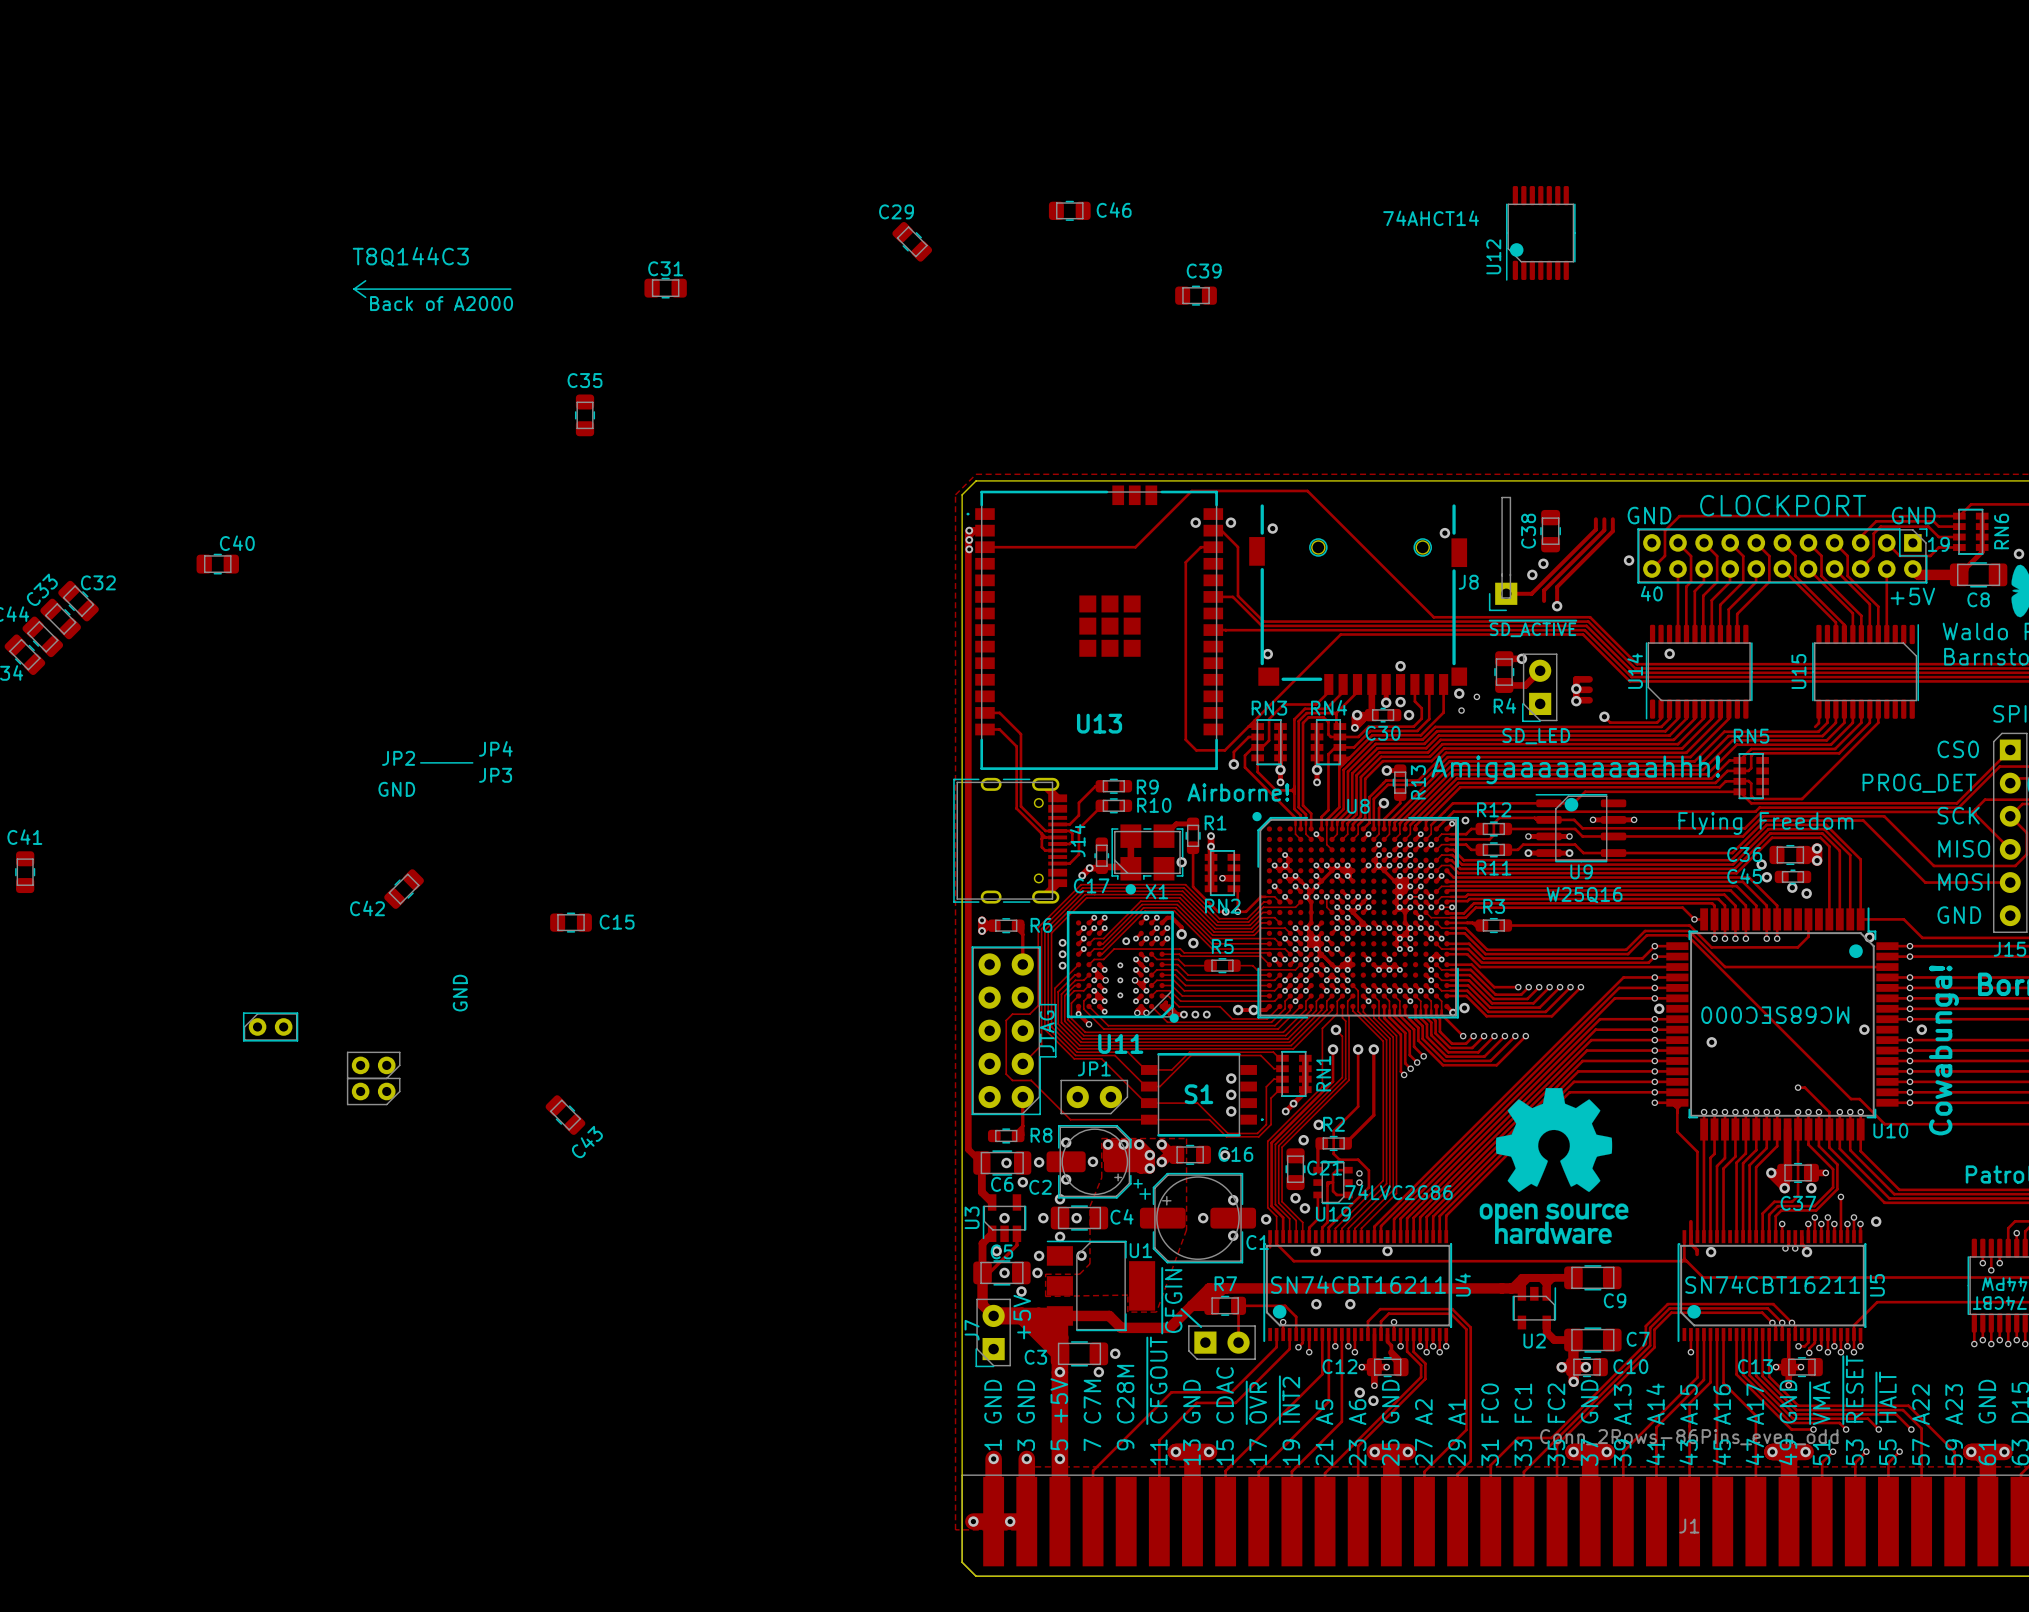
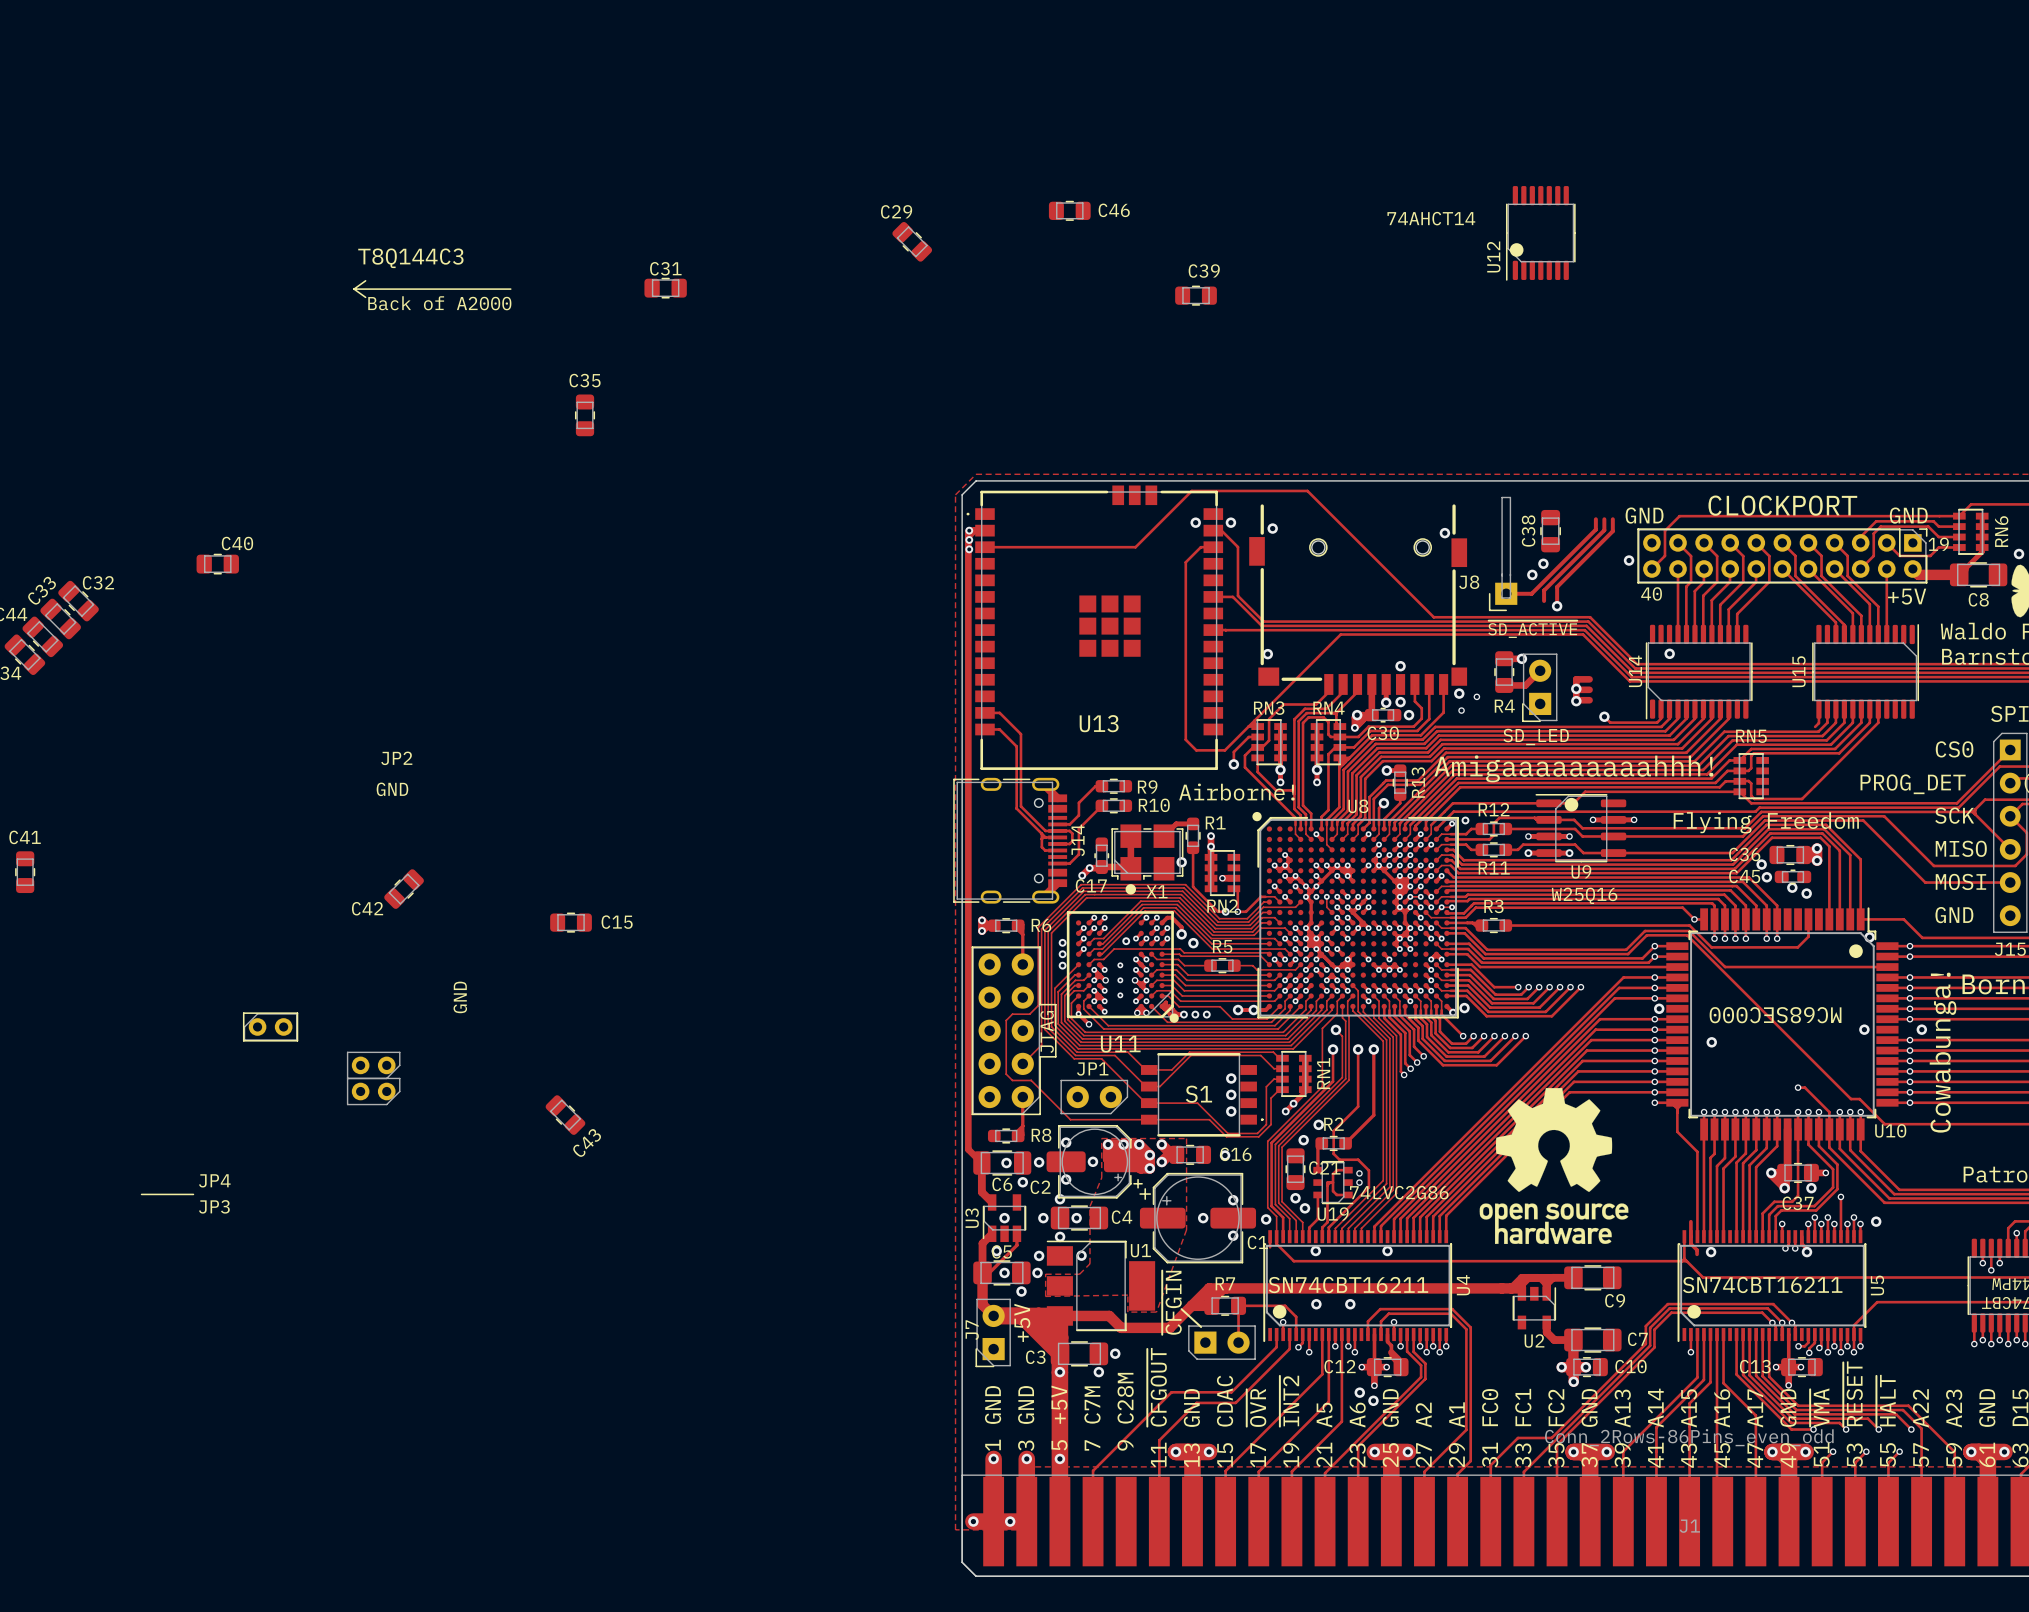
text: JP4 (495, 748) -> none
line: (420, 762) (472, 762) -> none
text: JP3 (495, 775) -> none
text: none -> JP4 (214, 1180)
line: none -> (141, 1194) (193, 1194)
text: none -> JP3 (214, 1206)

